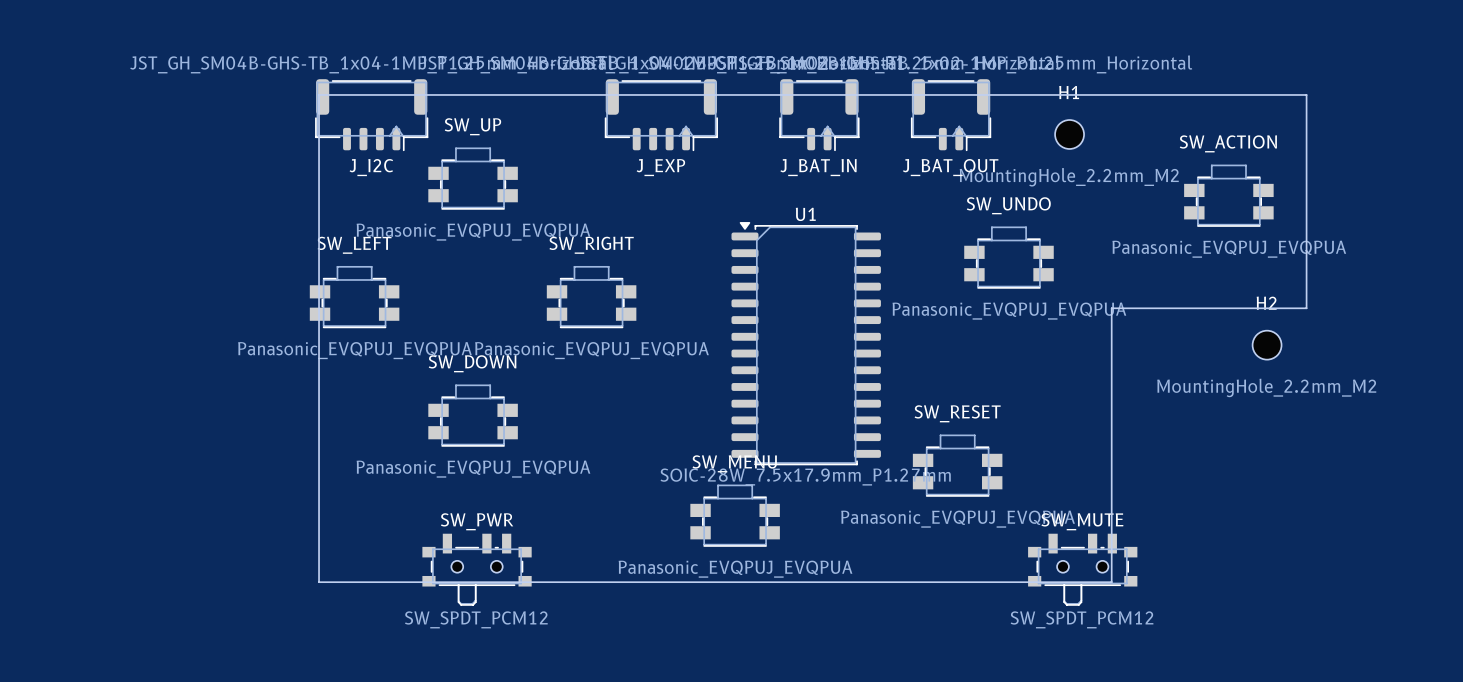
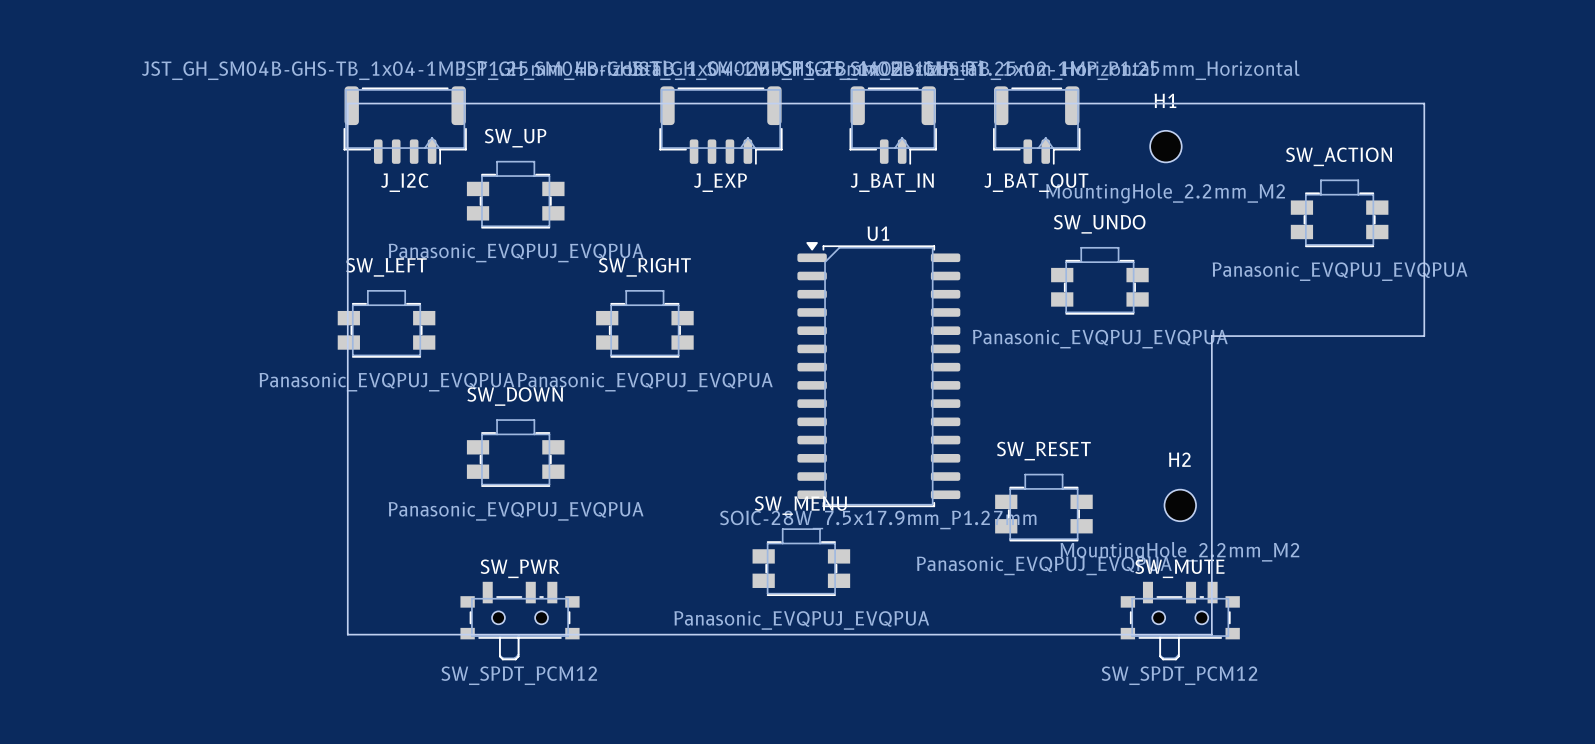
H2 position: (1267, 345) -> (1180, 505)

